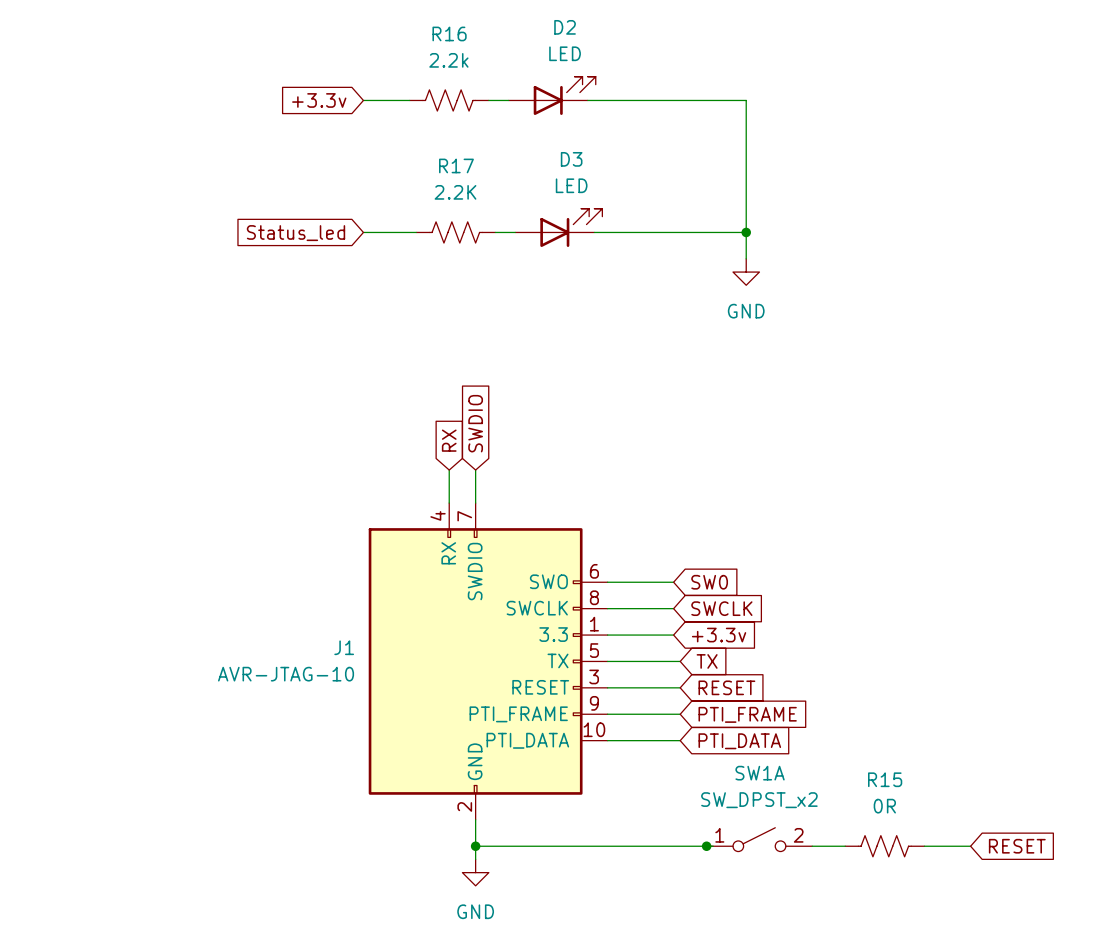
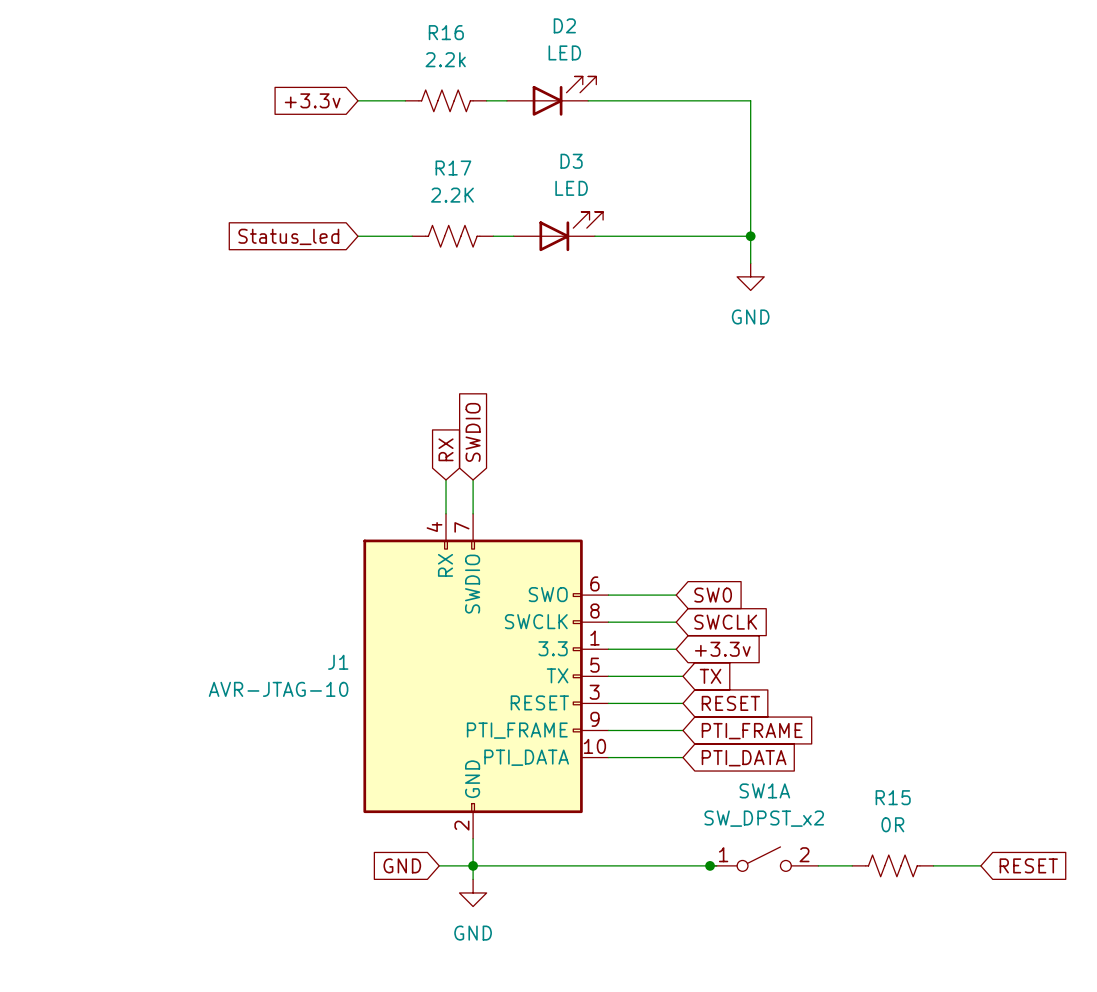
global label: none -> GND (402, 865)
wire: none -> (439, 865) (473, 865)

